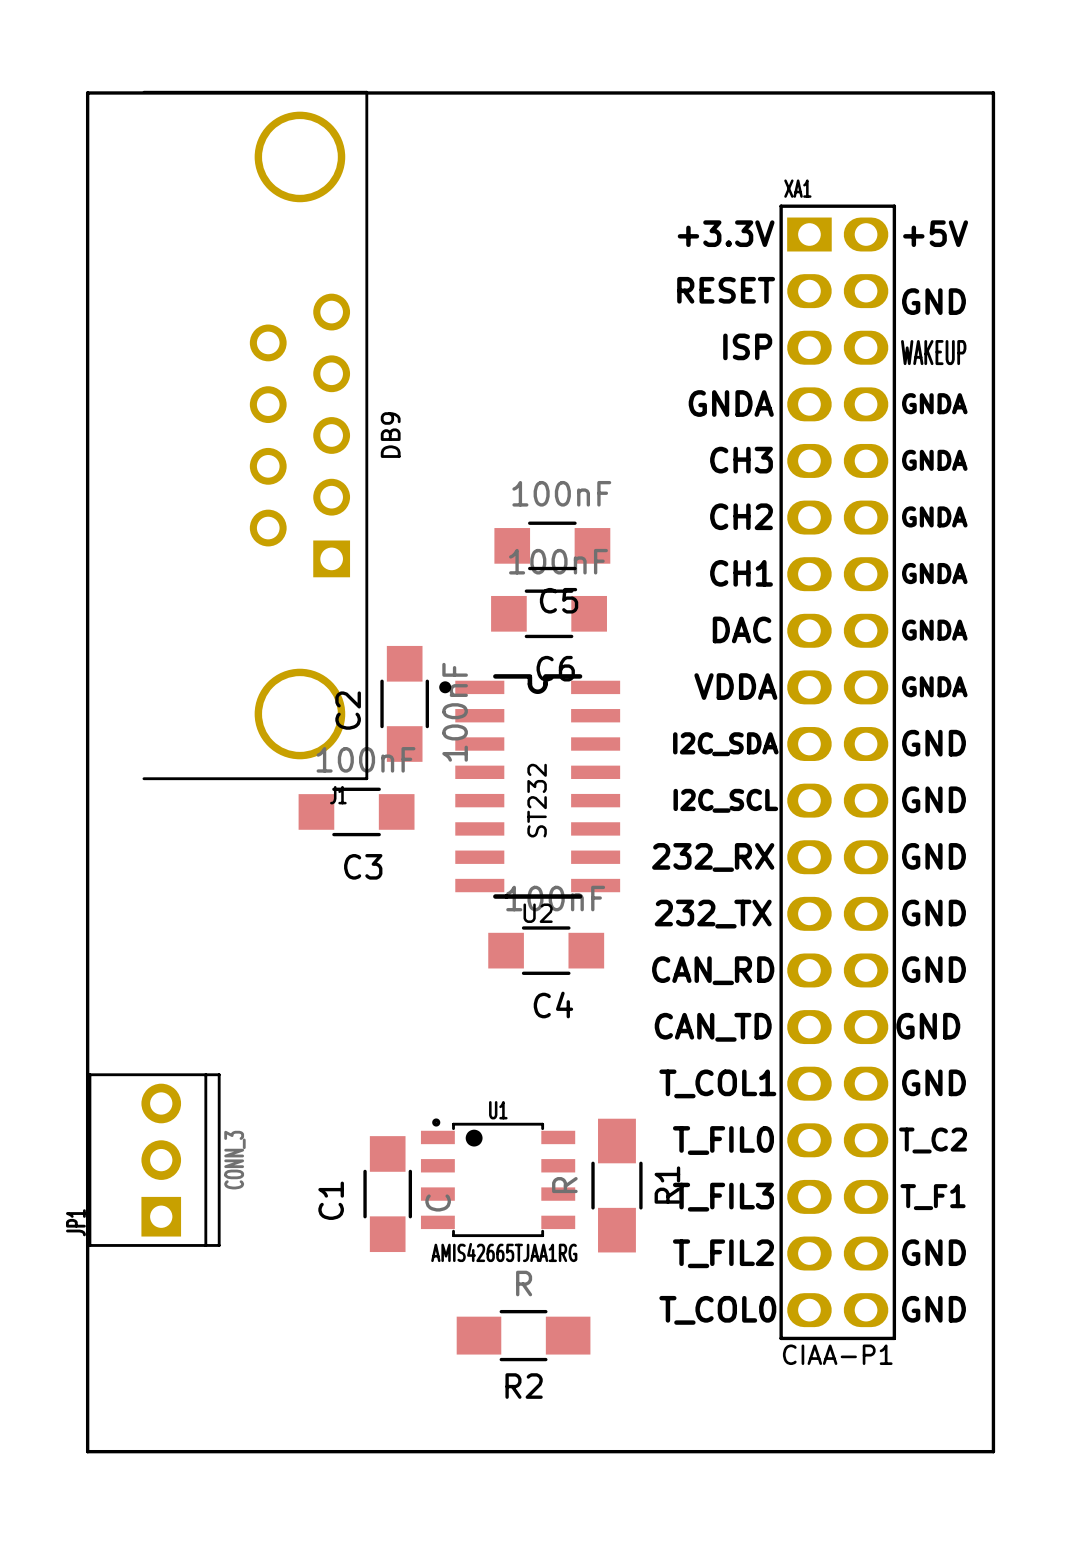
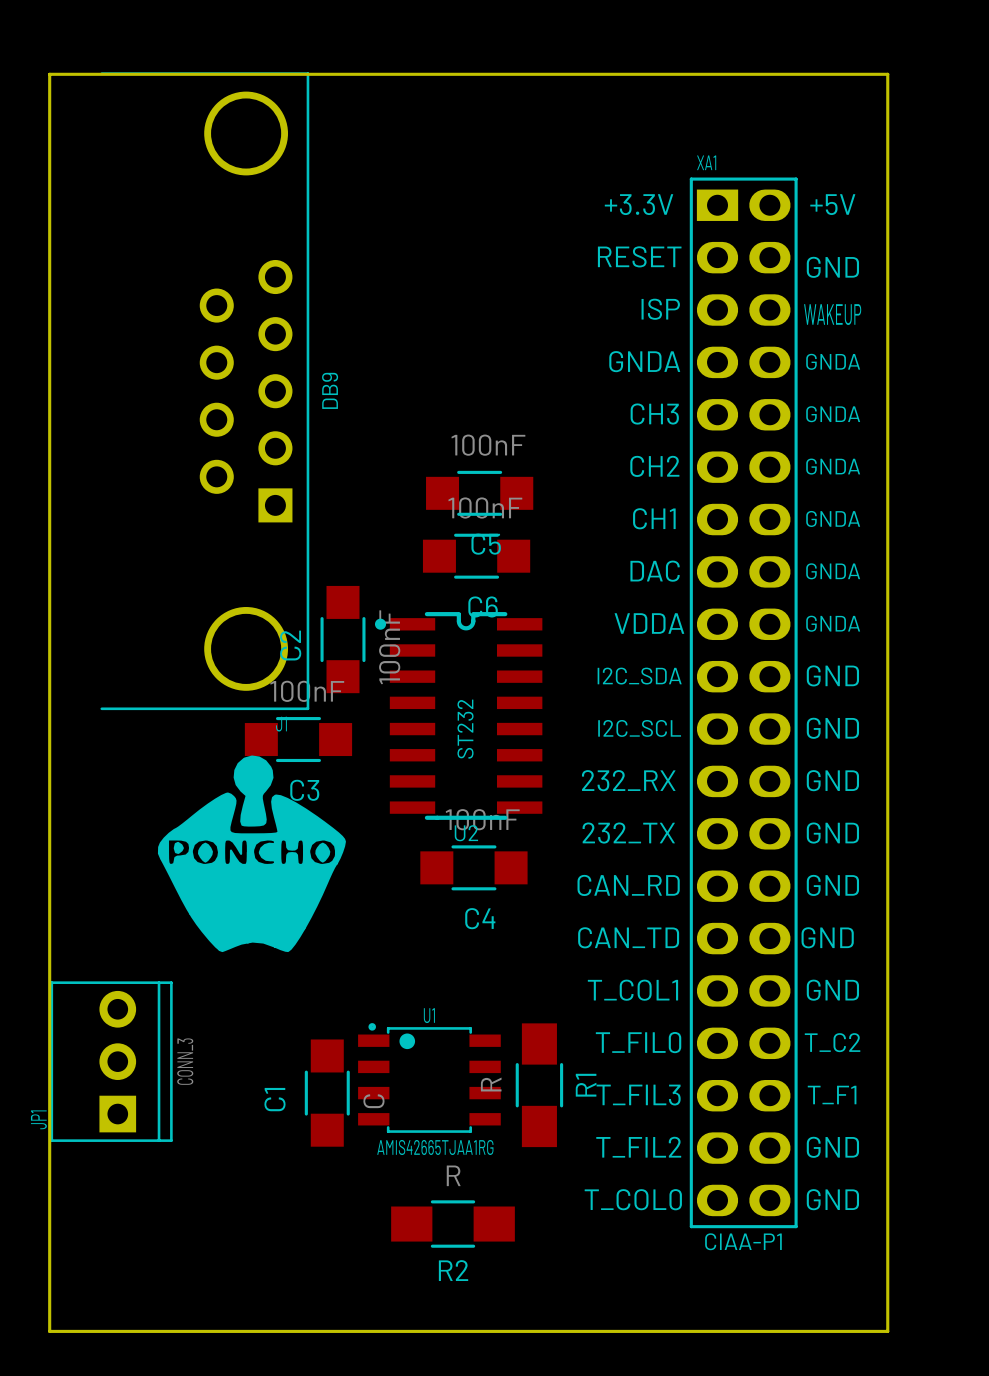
drawing: none -> [157, 755, 346, 953]

